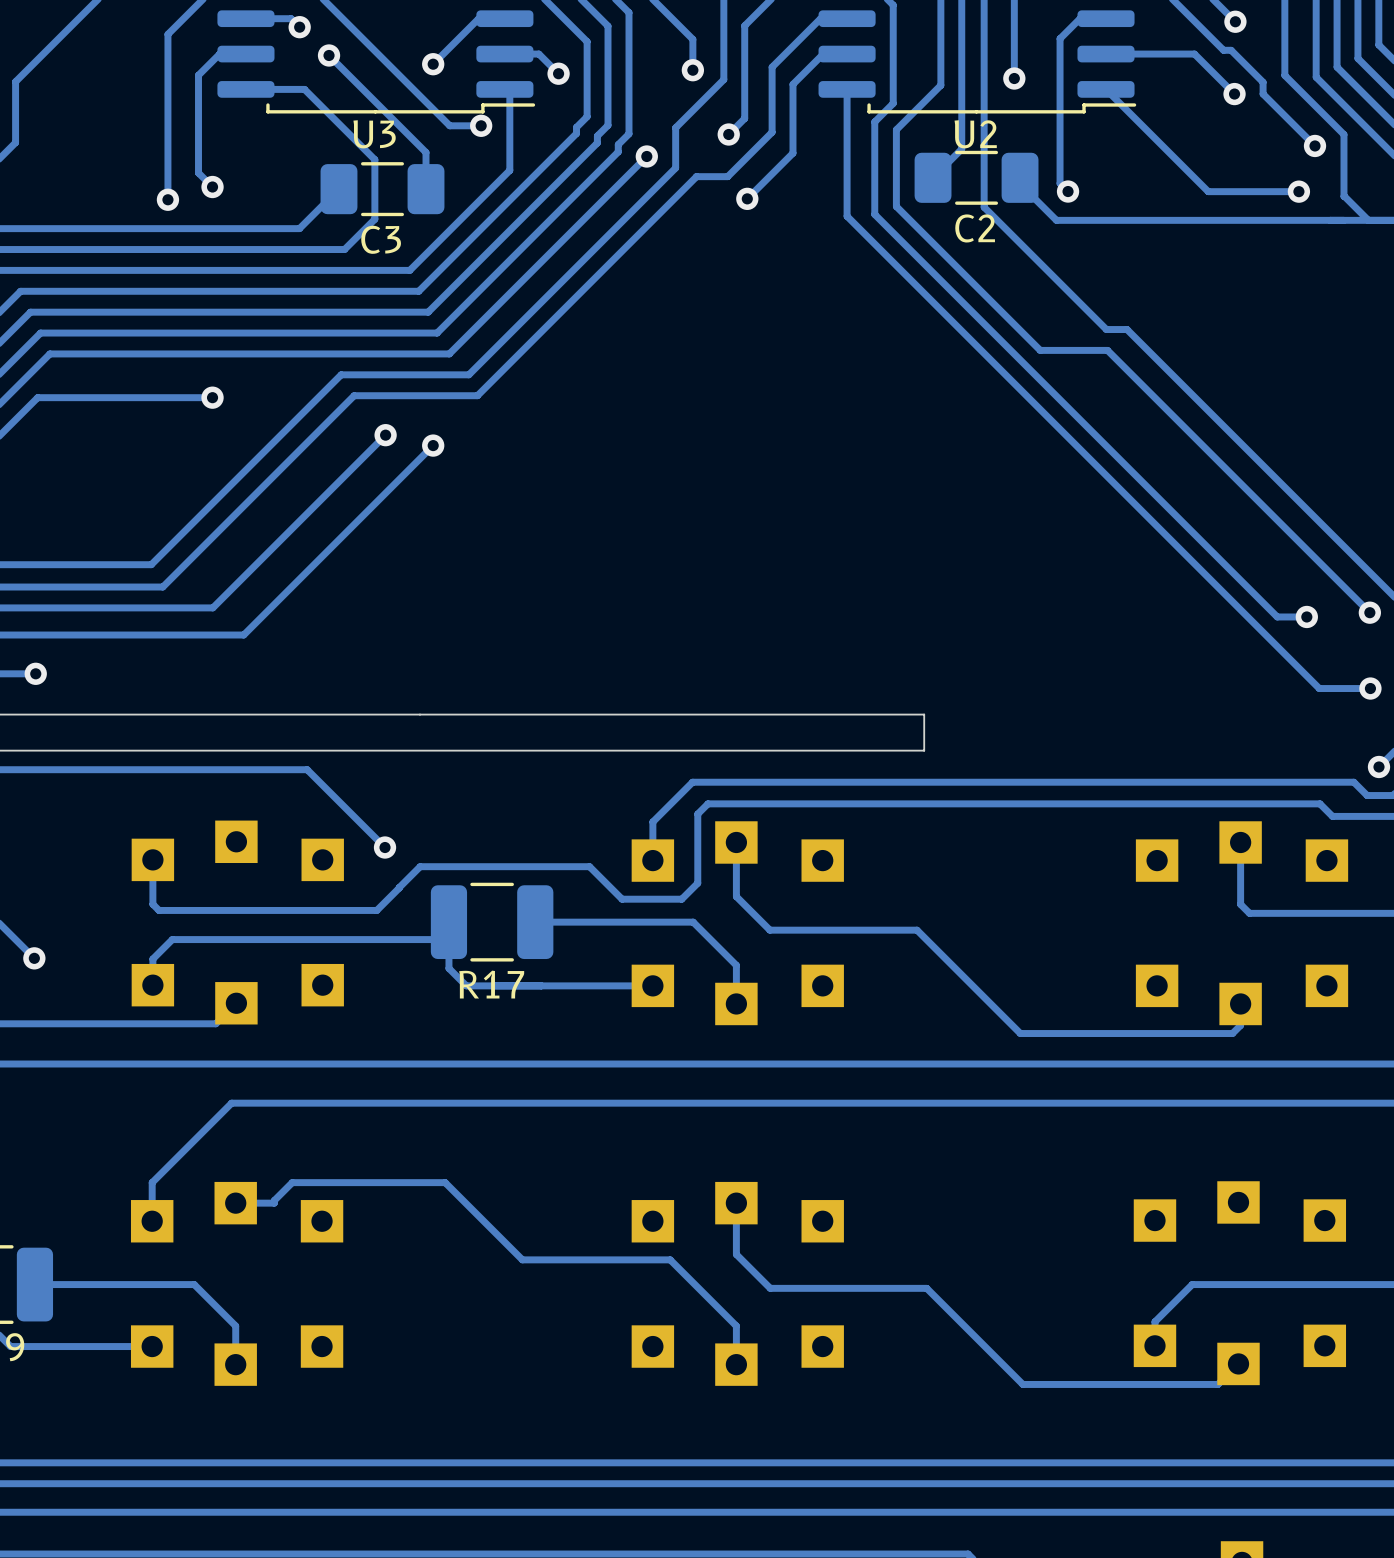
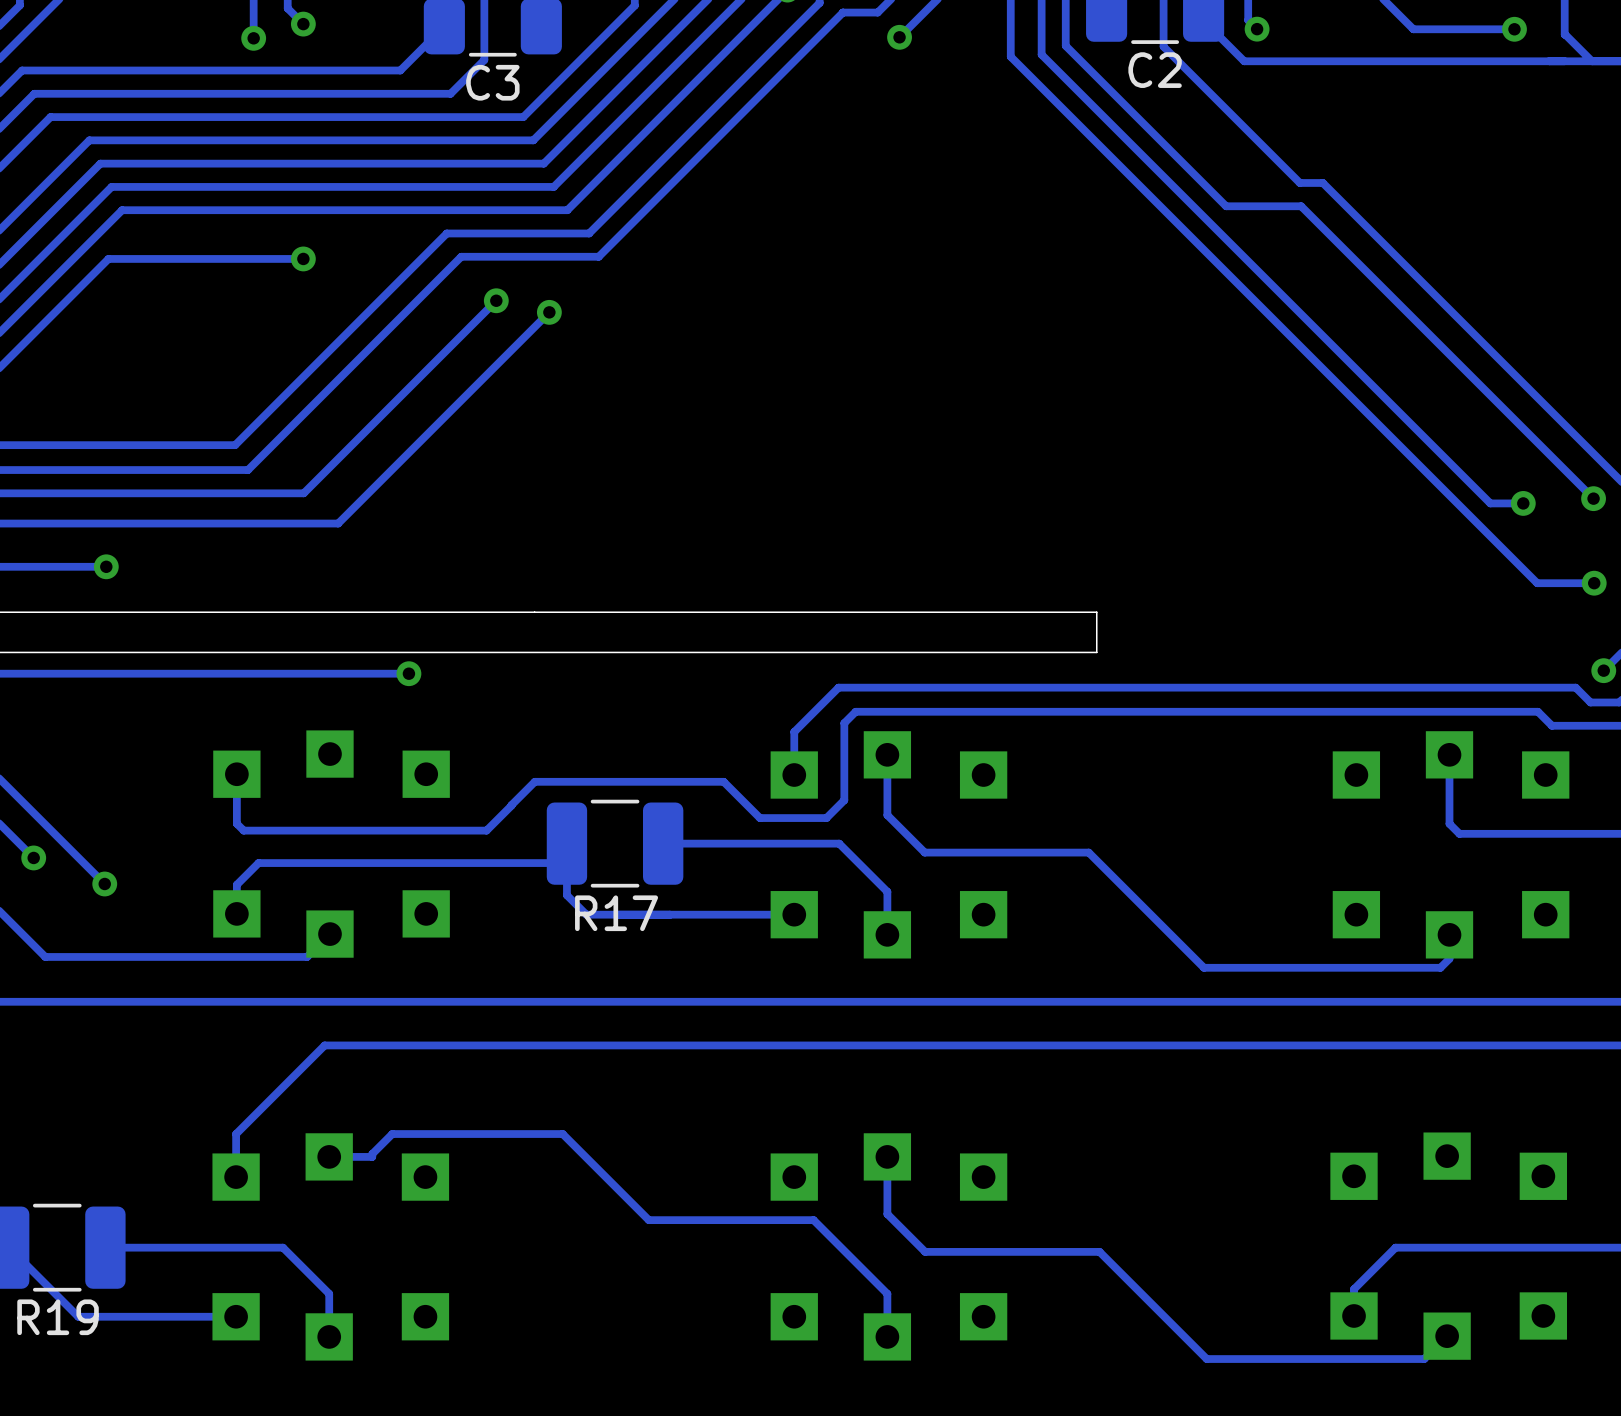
track: (307, 769) (385, 847) -> none
via position: (385, 847) -> (408, 673)

